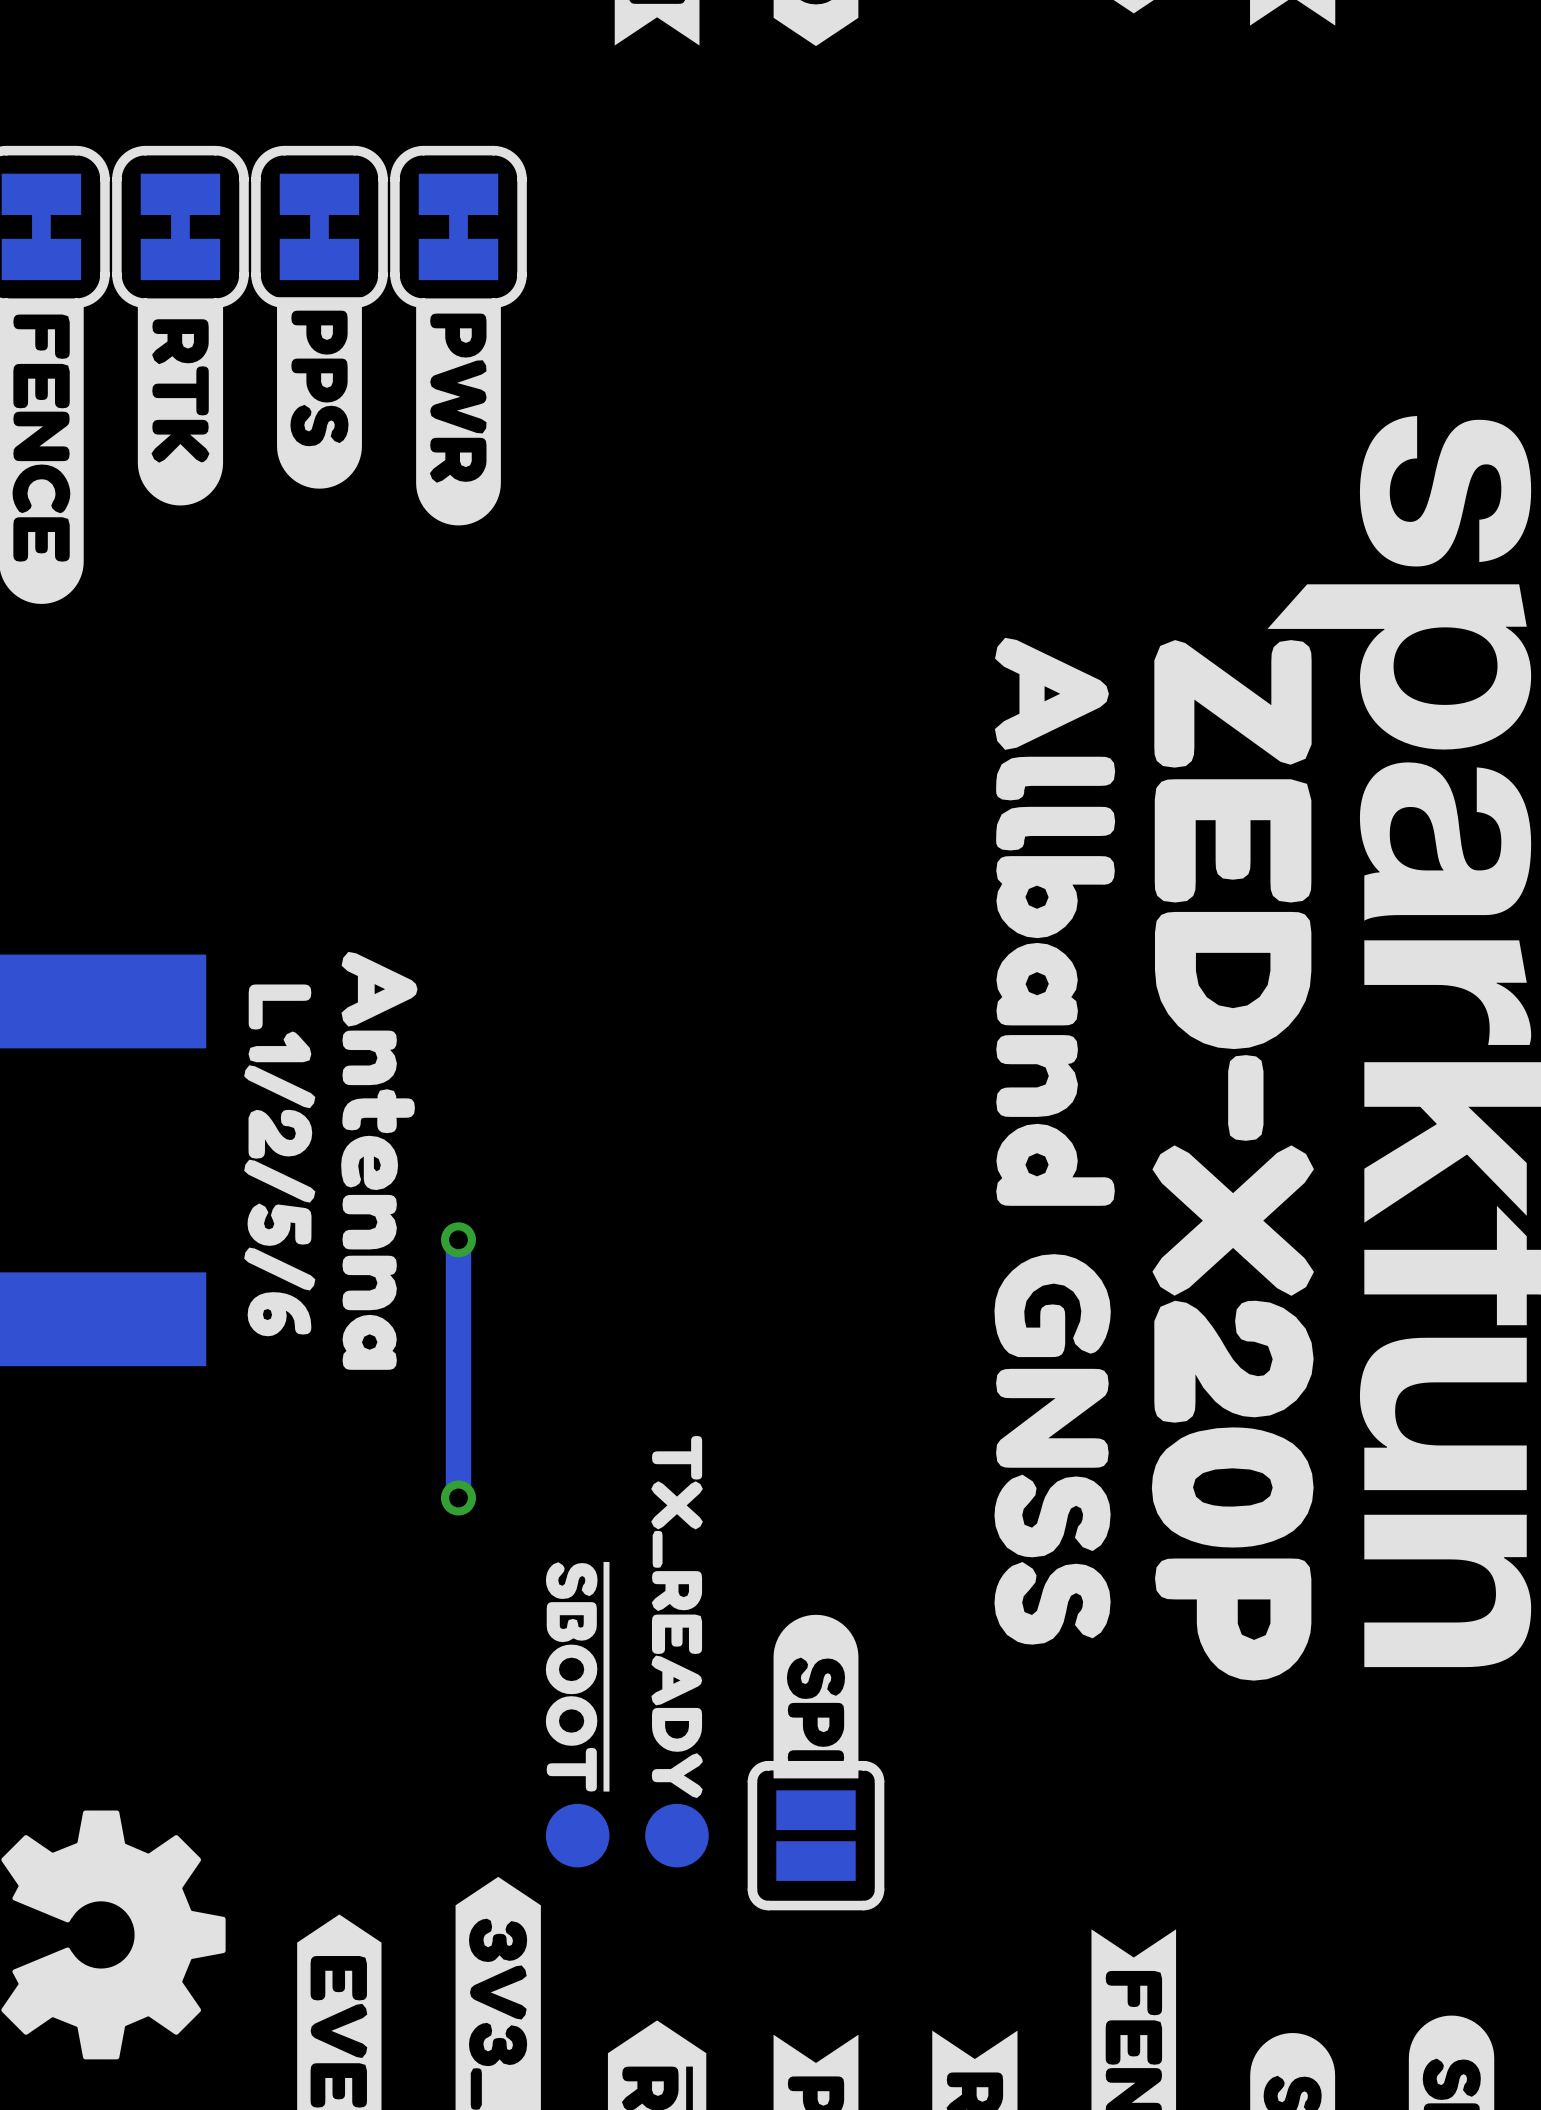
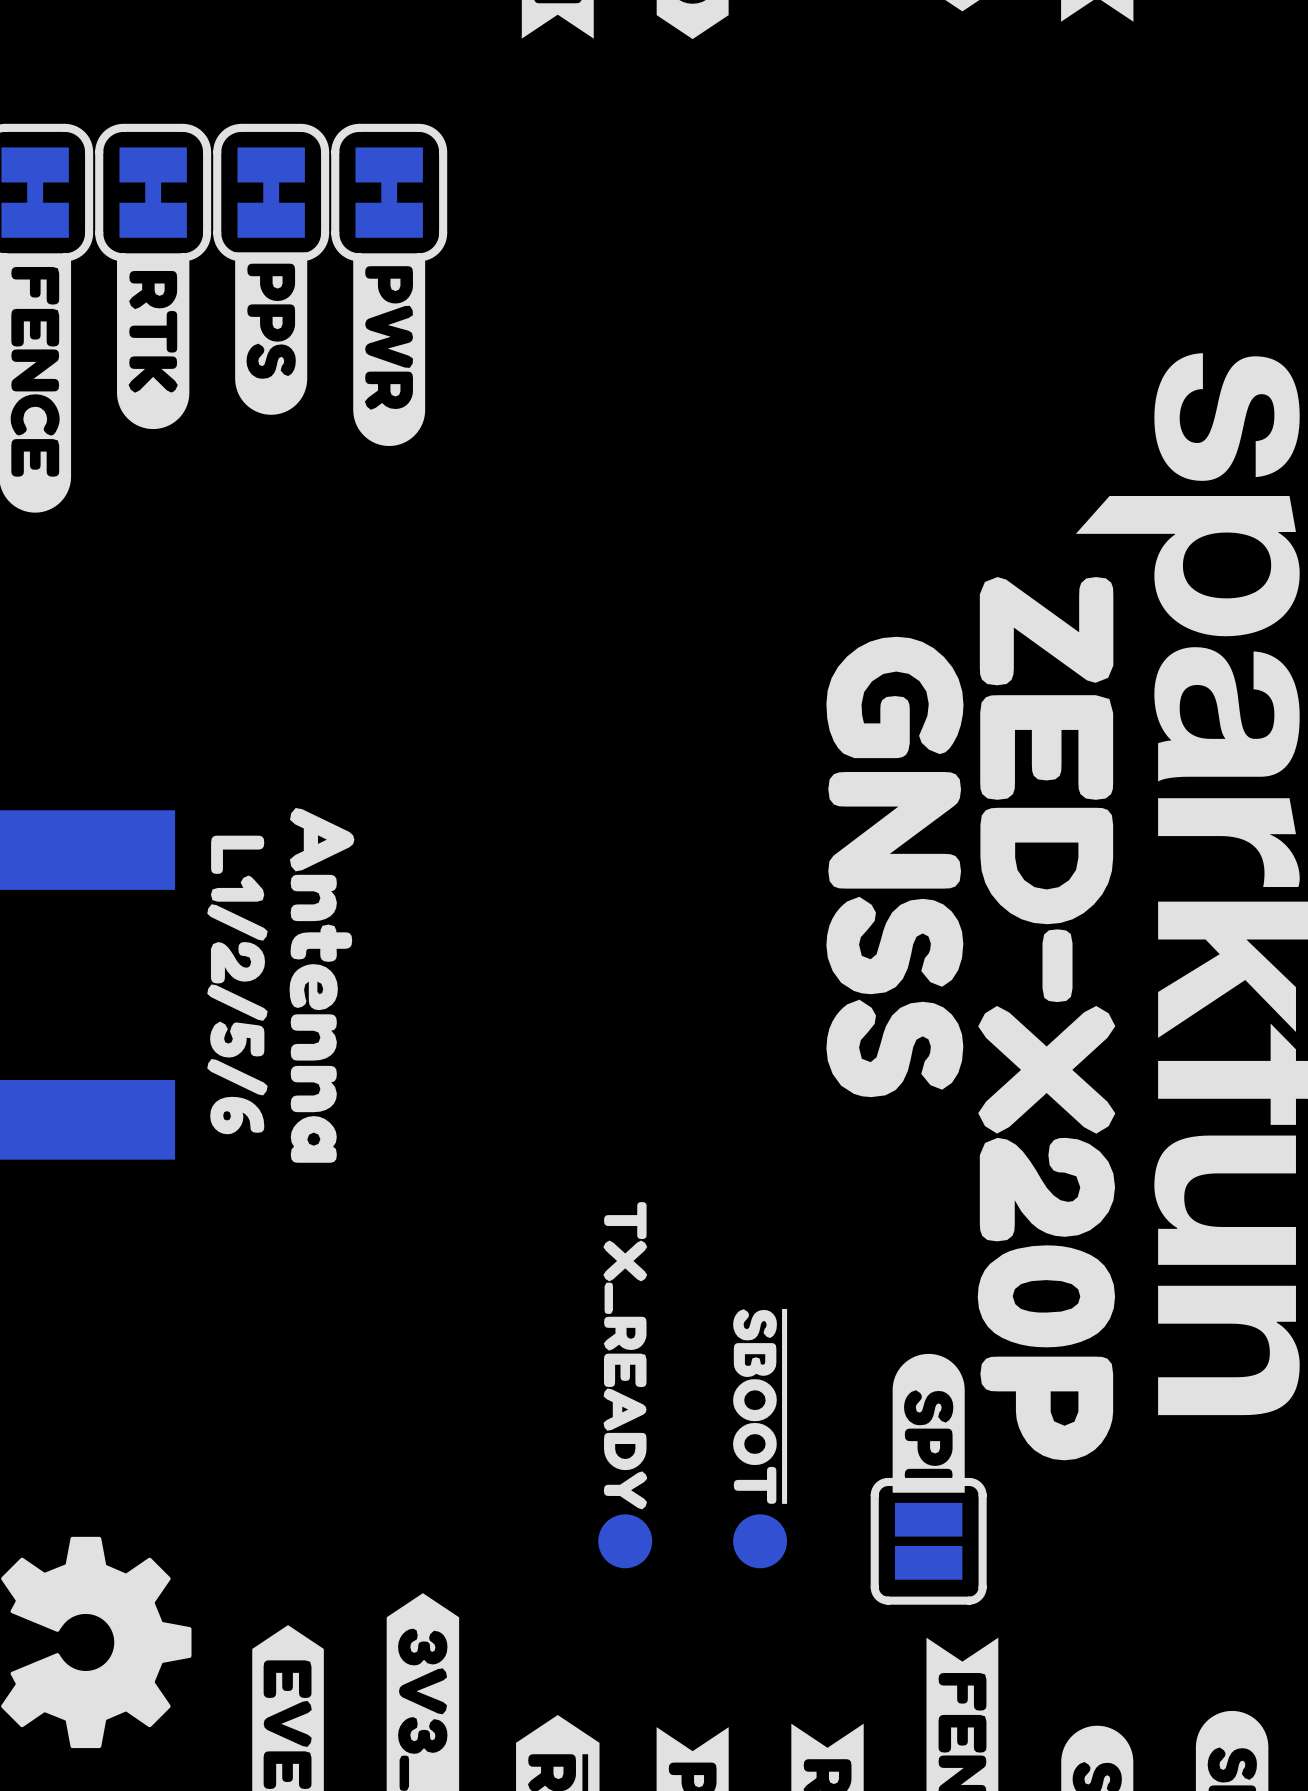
drawing: [994, 637, 1116, 1645] -> none
drawing: none -> [826, 636, 964, 1098]
drawing position: (1232, 1160) -> (1046, 1018)
track: (458, 1239) (458, 1498) -> none
via: (458, 1239) -> none
via: (458, 1498) -> none
drawing position: (677, 1616) -> (625, 1355)
drawing position: (577, 1676) -> (760, 1406)
drawing position: (816, 1696) -> (928, 1423)
part: none -> (760, 1541)
part: (577, 1835) -> none
part position: (676, 1835) -> (625, 1541)
part position: (816, 1835) -> (928, 1541)

